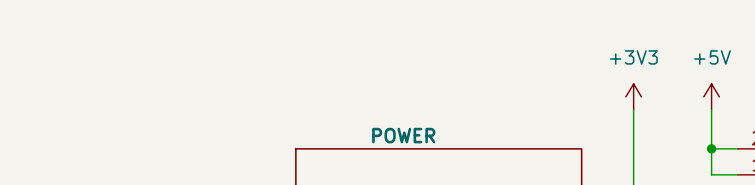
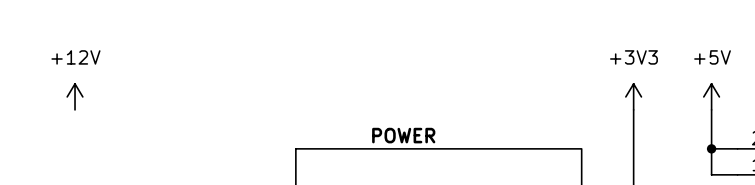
power symbol: none -> +12V (75, 96)

